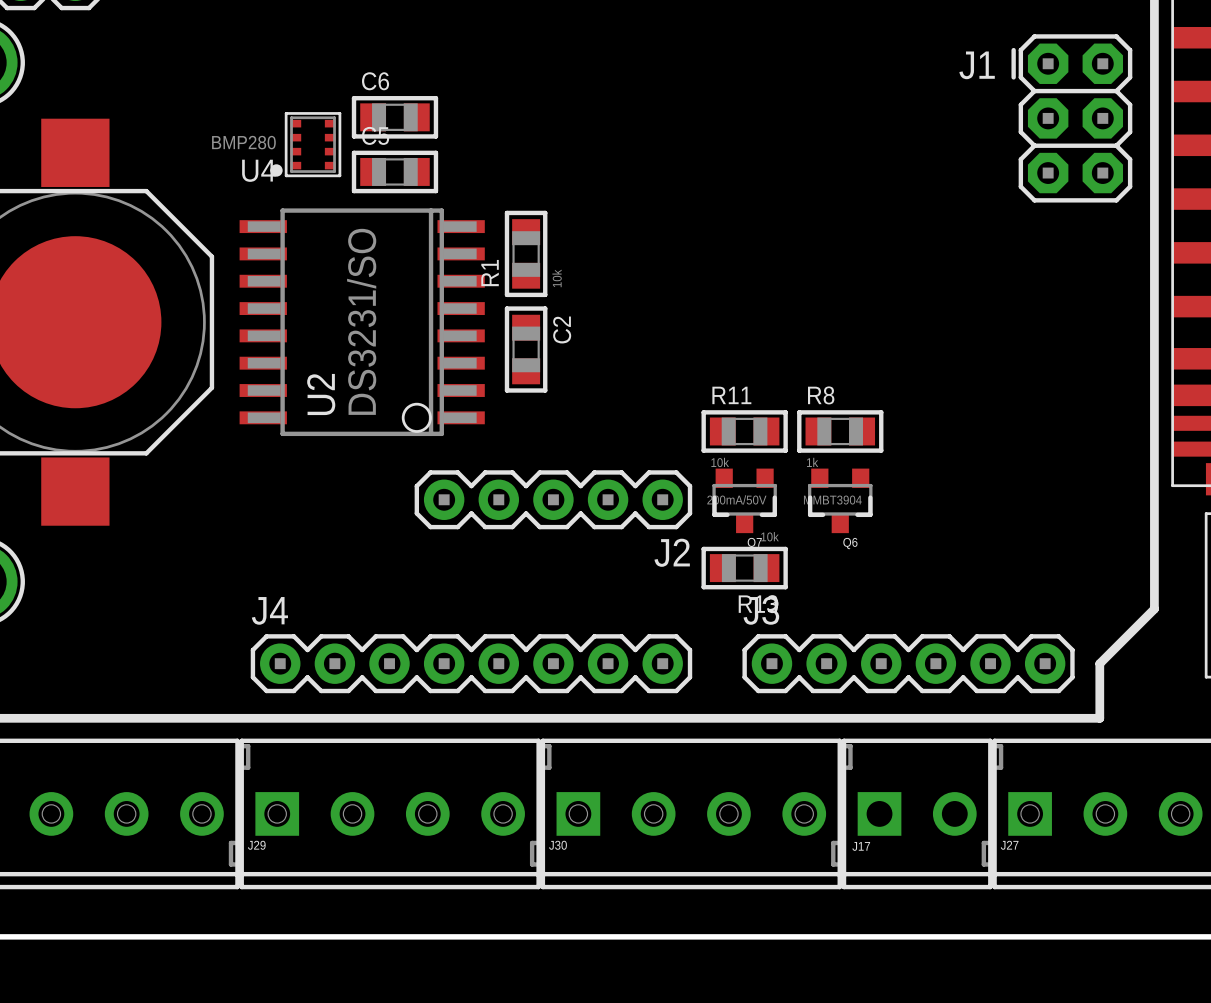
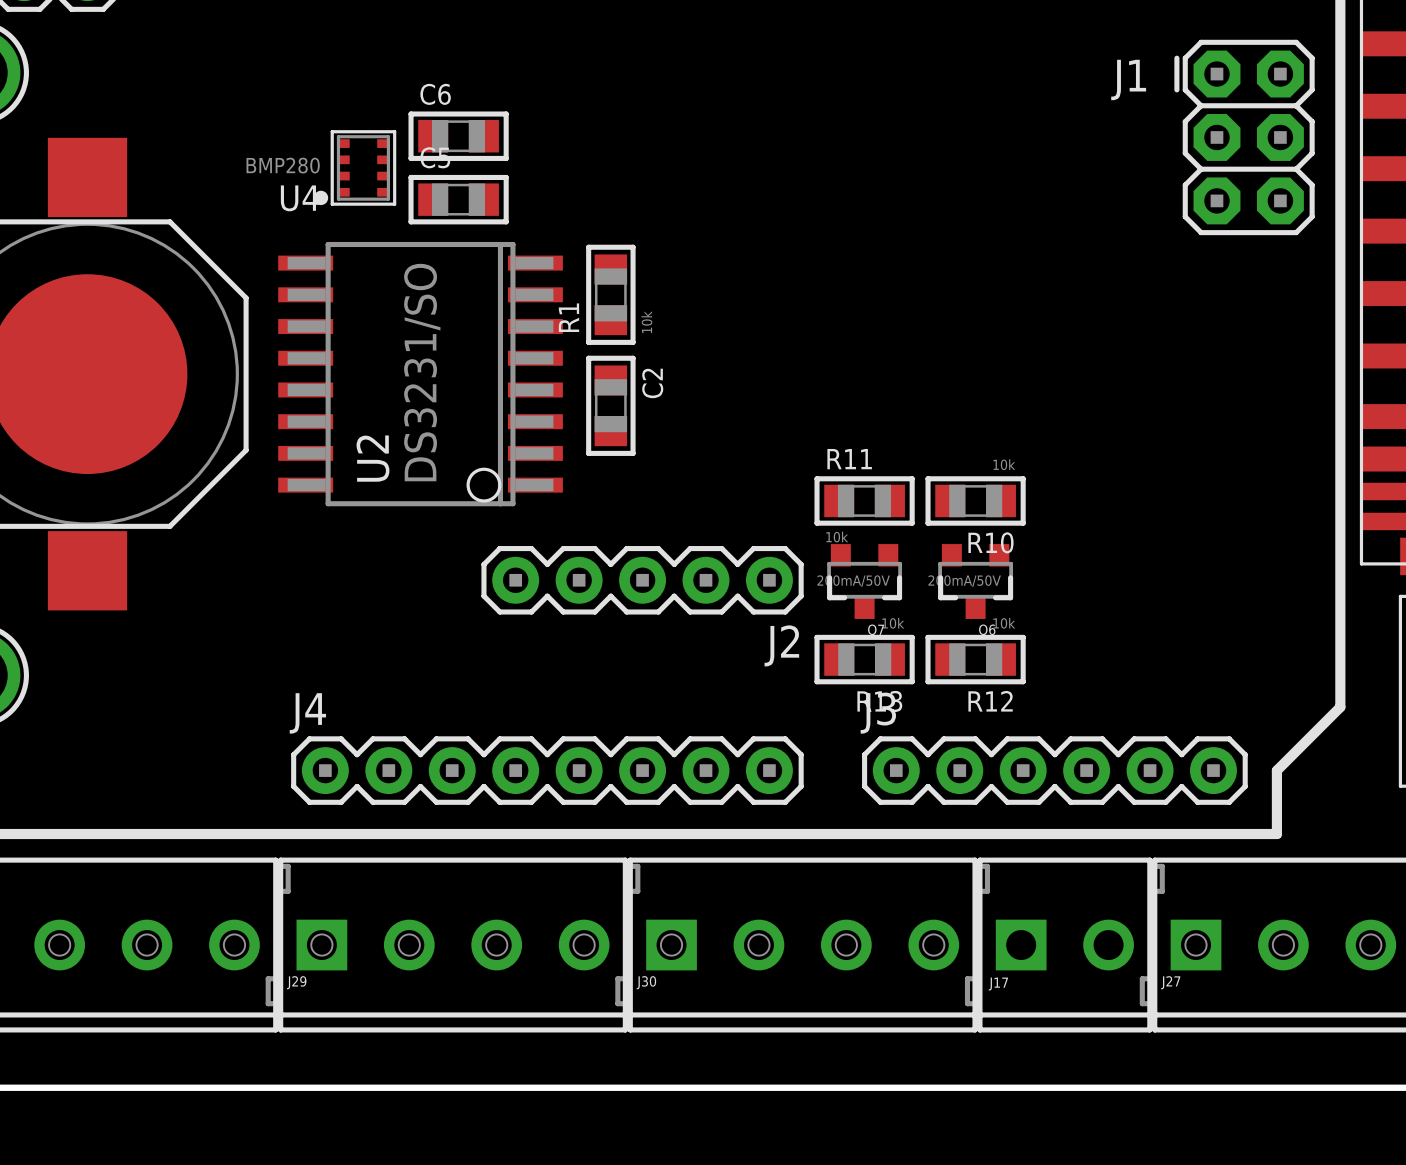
R8 name: R8 (821, 395) -> R10 (991, 542)
R8 value: 1k (812, 462) -> 10k (1004, 464)
Q6 value: MMBT3904 (832, 500) -> 200mA/50V (964, 581)
R12: none -> 10k (975, 659)

